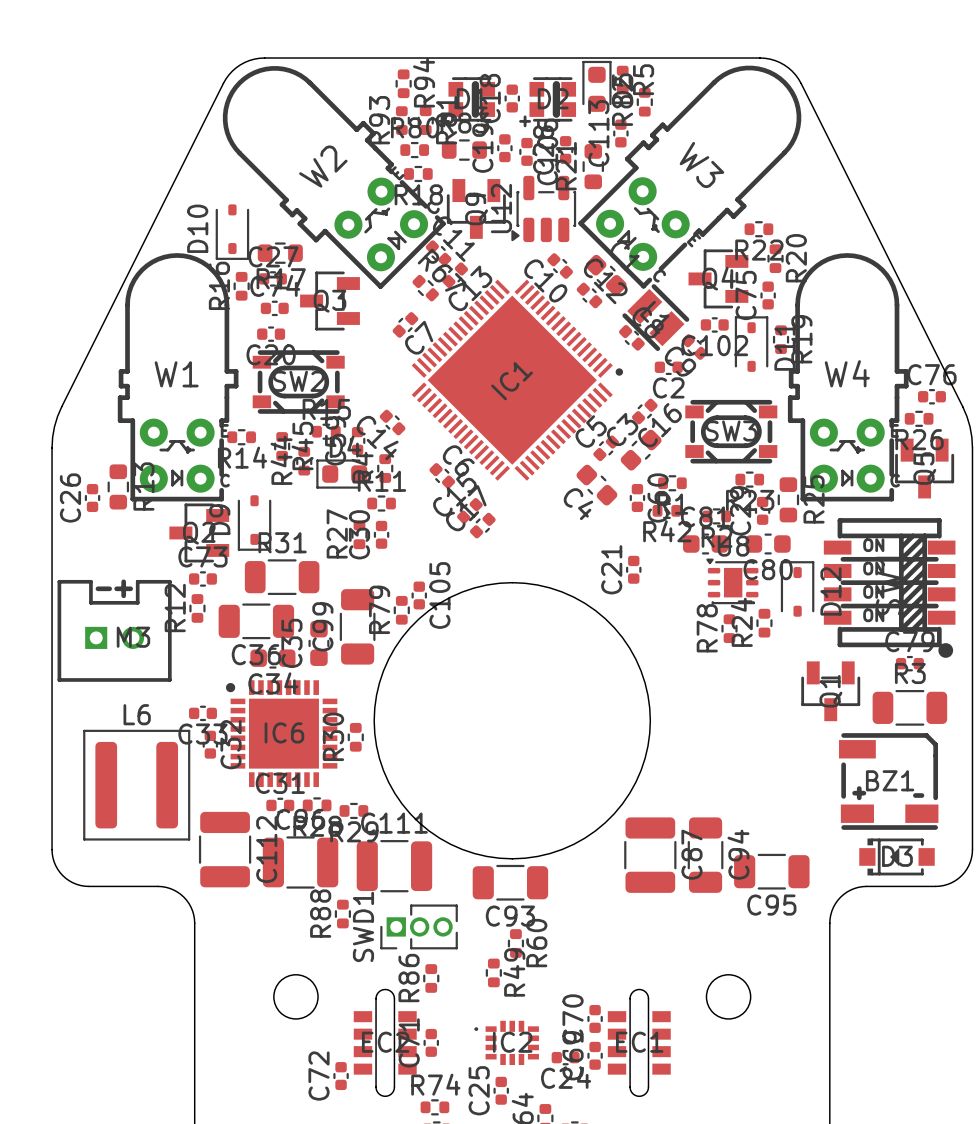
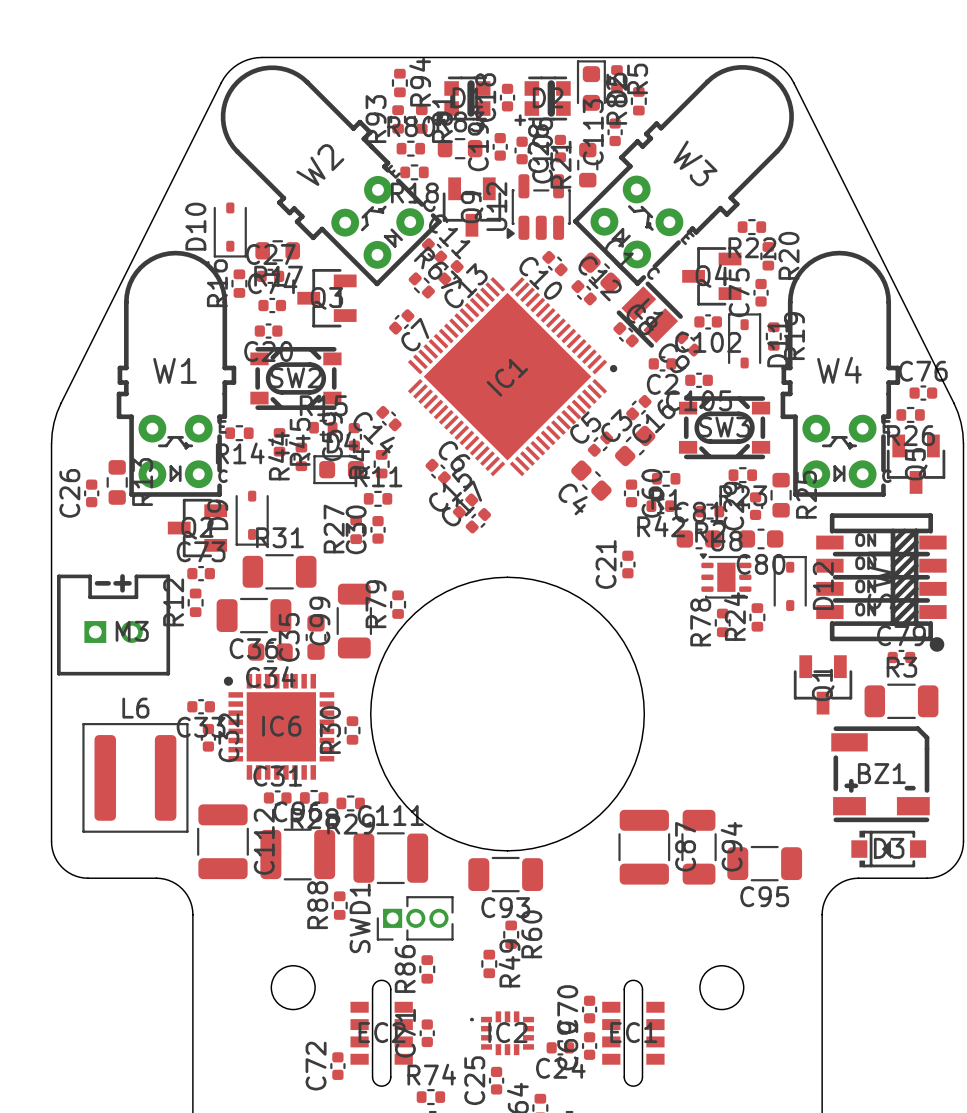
C105 rotation: 0° (419, 595) -> 90° clockwise (699, 380)
C105 position: (419, 595) -> (699, 380)

